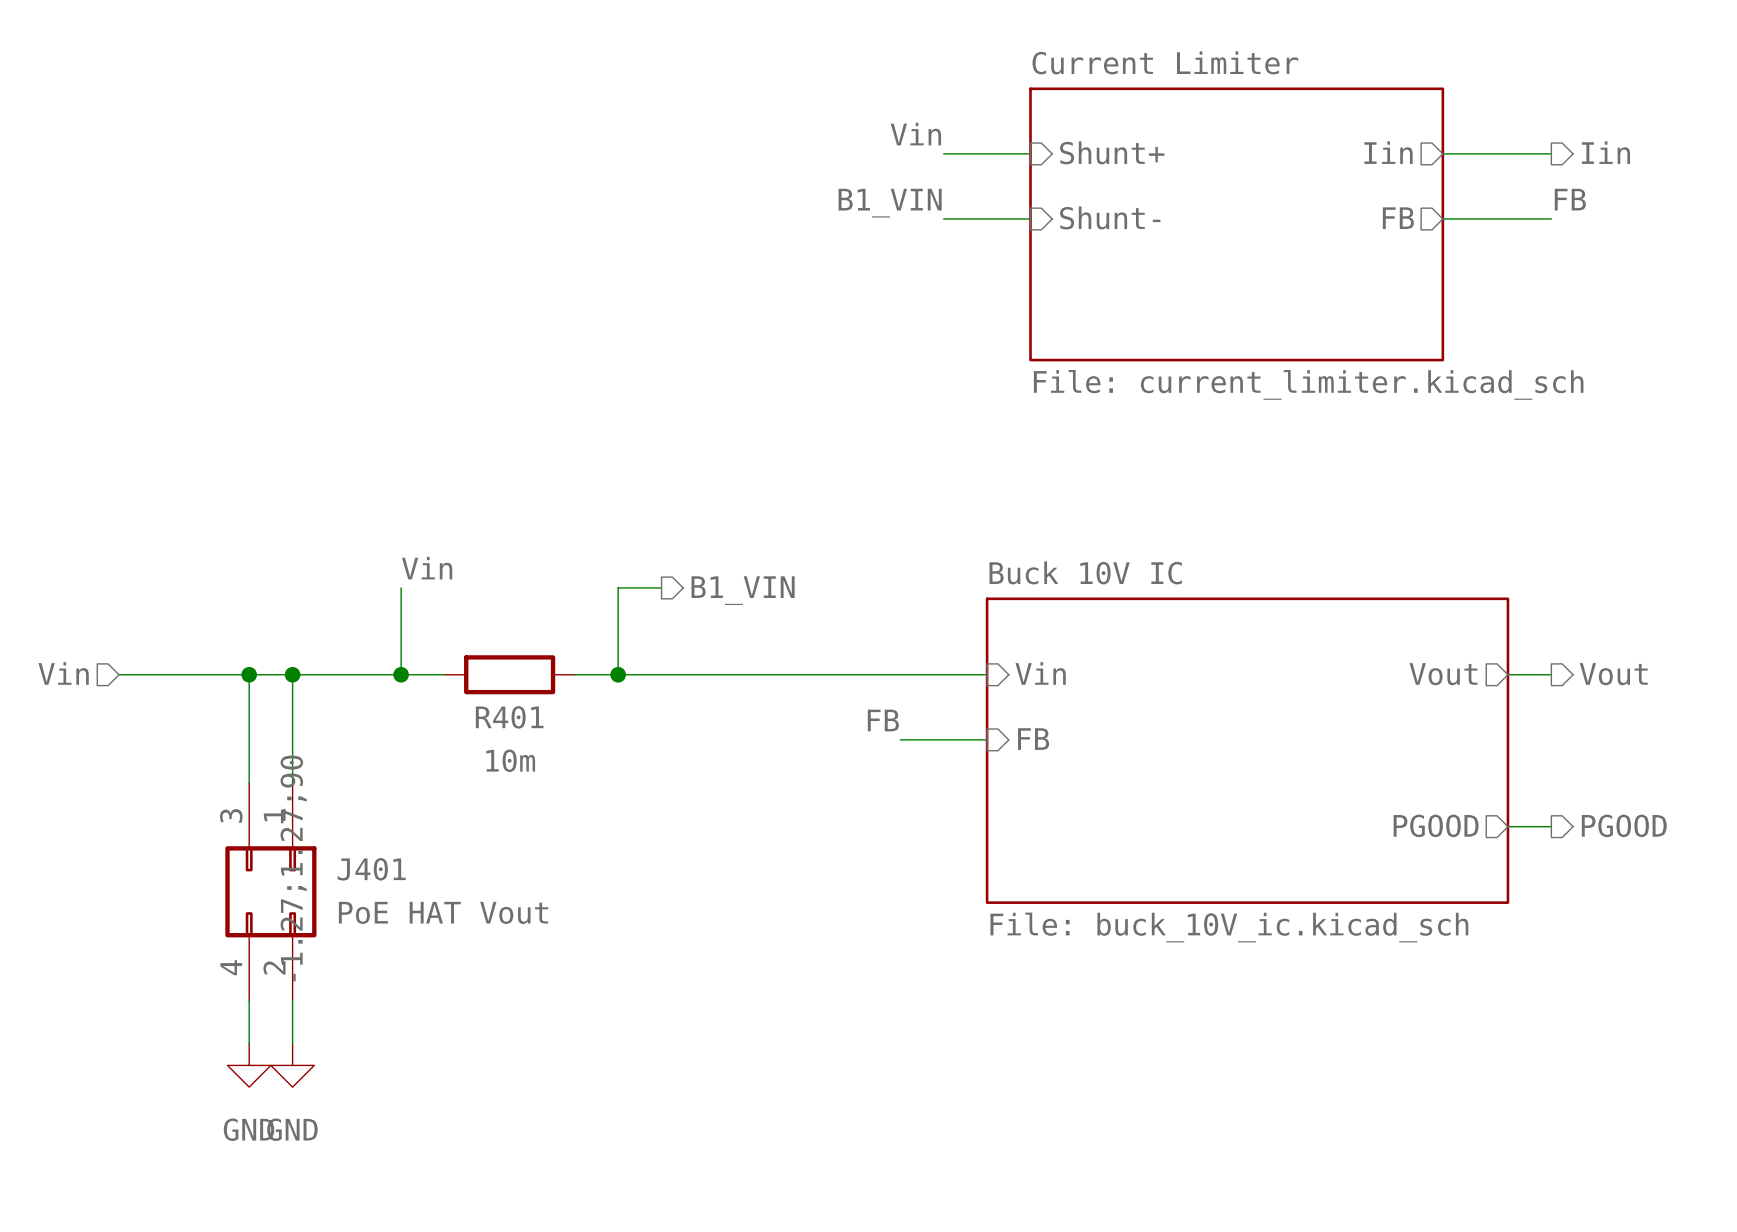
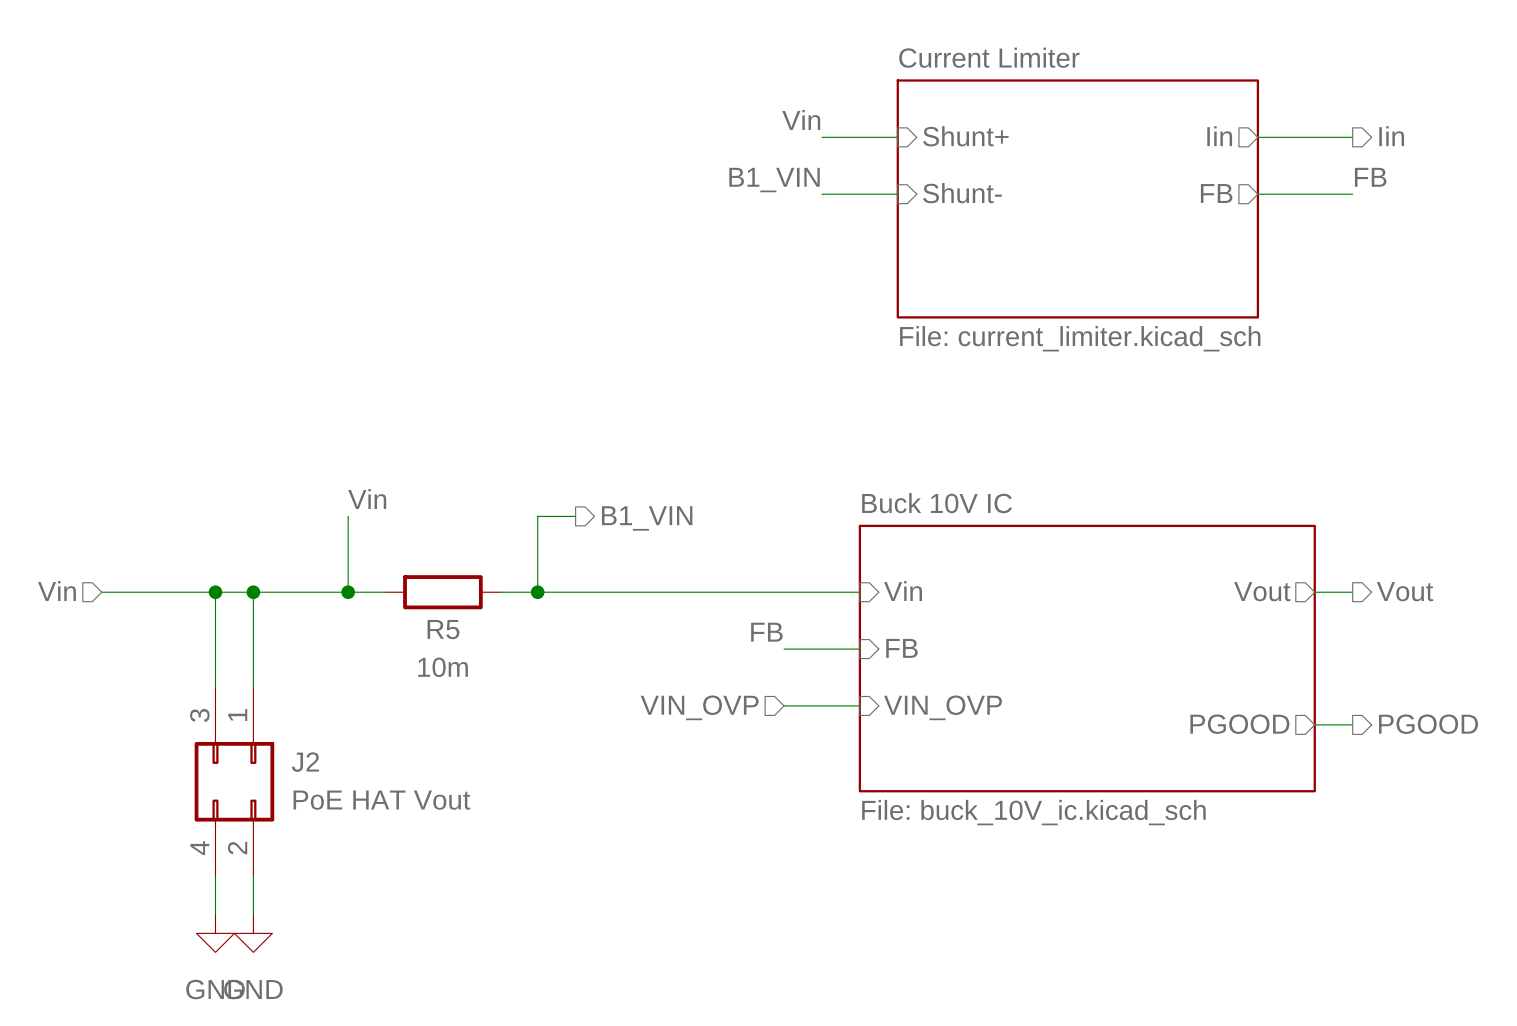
R401 name: R401 (509, 717) -> R5 (443, 629)
wire: none -> (784, 705) (859, 705)
hierarchical label: none -> VIN_OVP (699, 707)
sheet pin: none -> VIN_OVP (943, 707)
J401 text: -1.27;1.27;90 (293, 868) -> none
J401 name: J401 (371, 869) -> J2 (305, 762)

